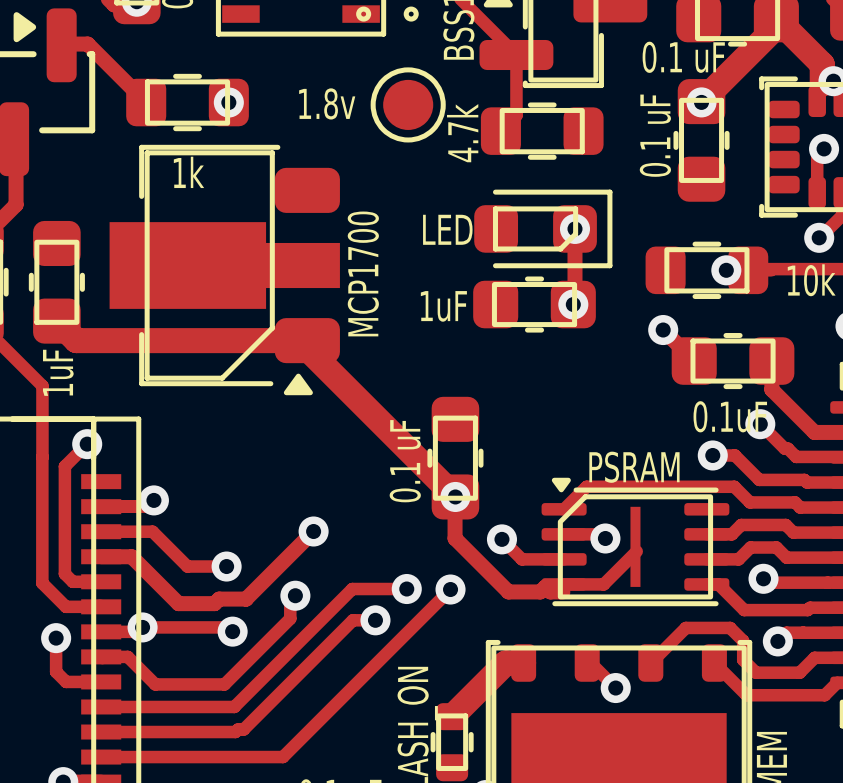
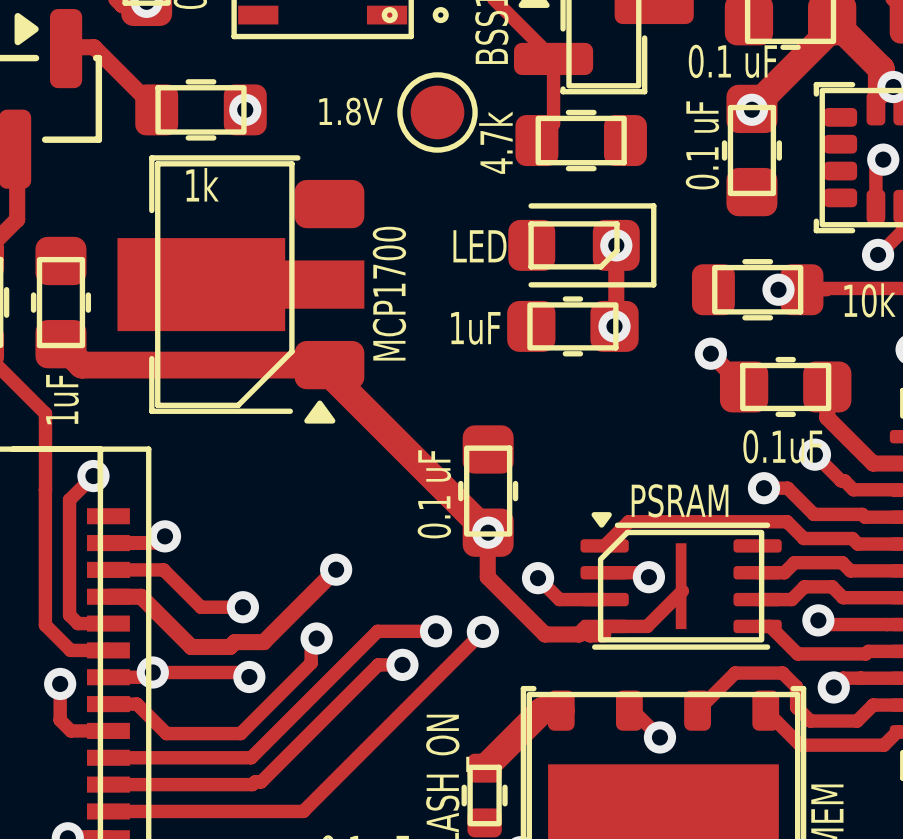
part value: 1.8v (327, 103) -> 1.8V (351, 111)

